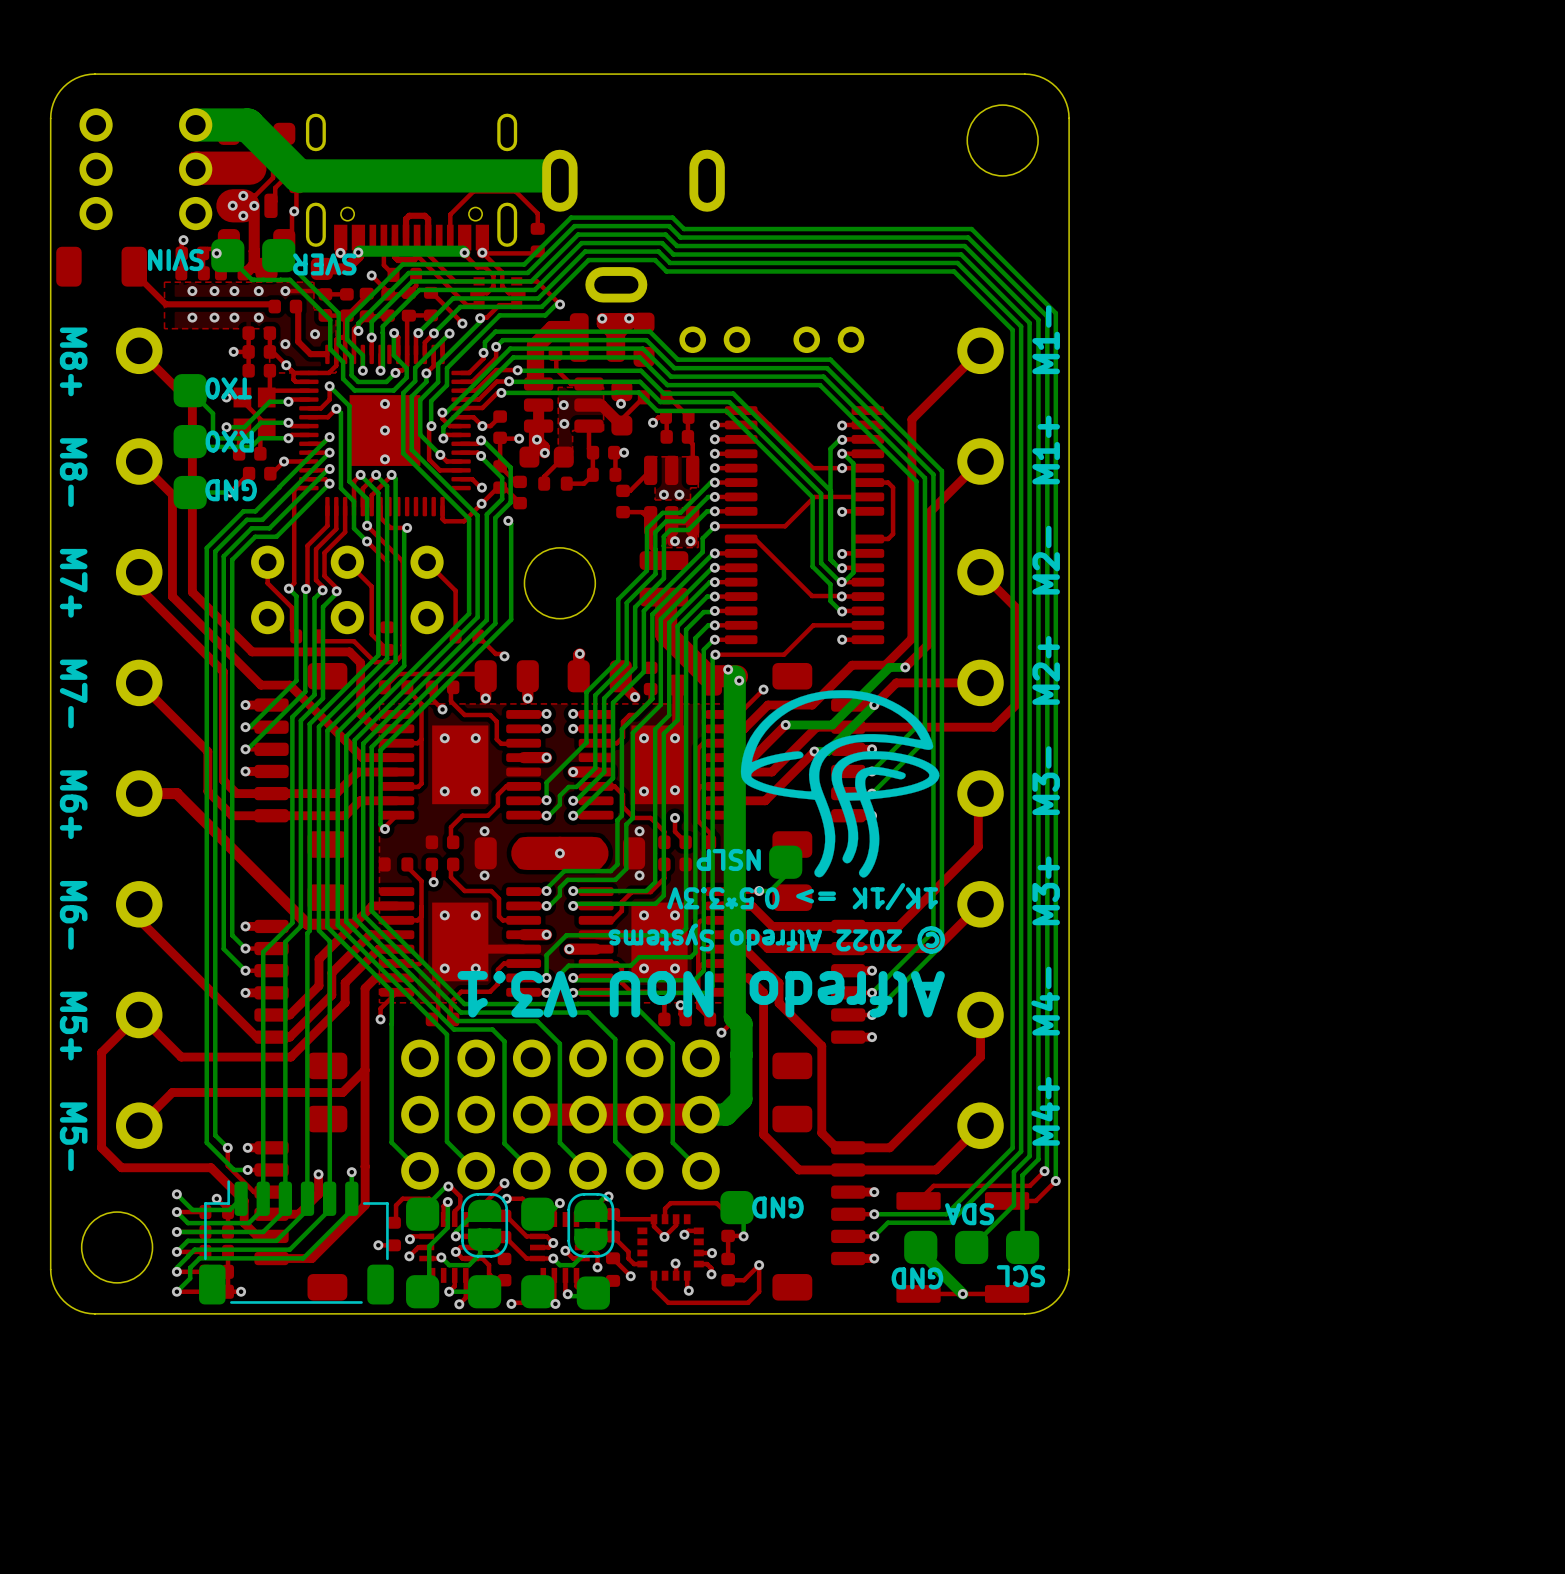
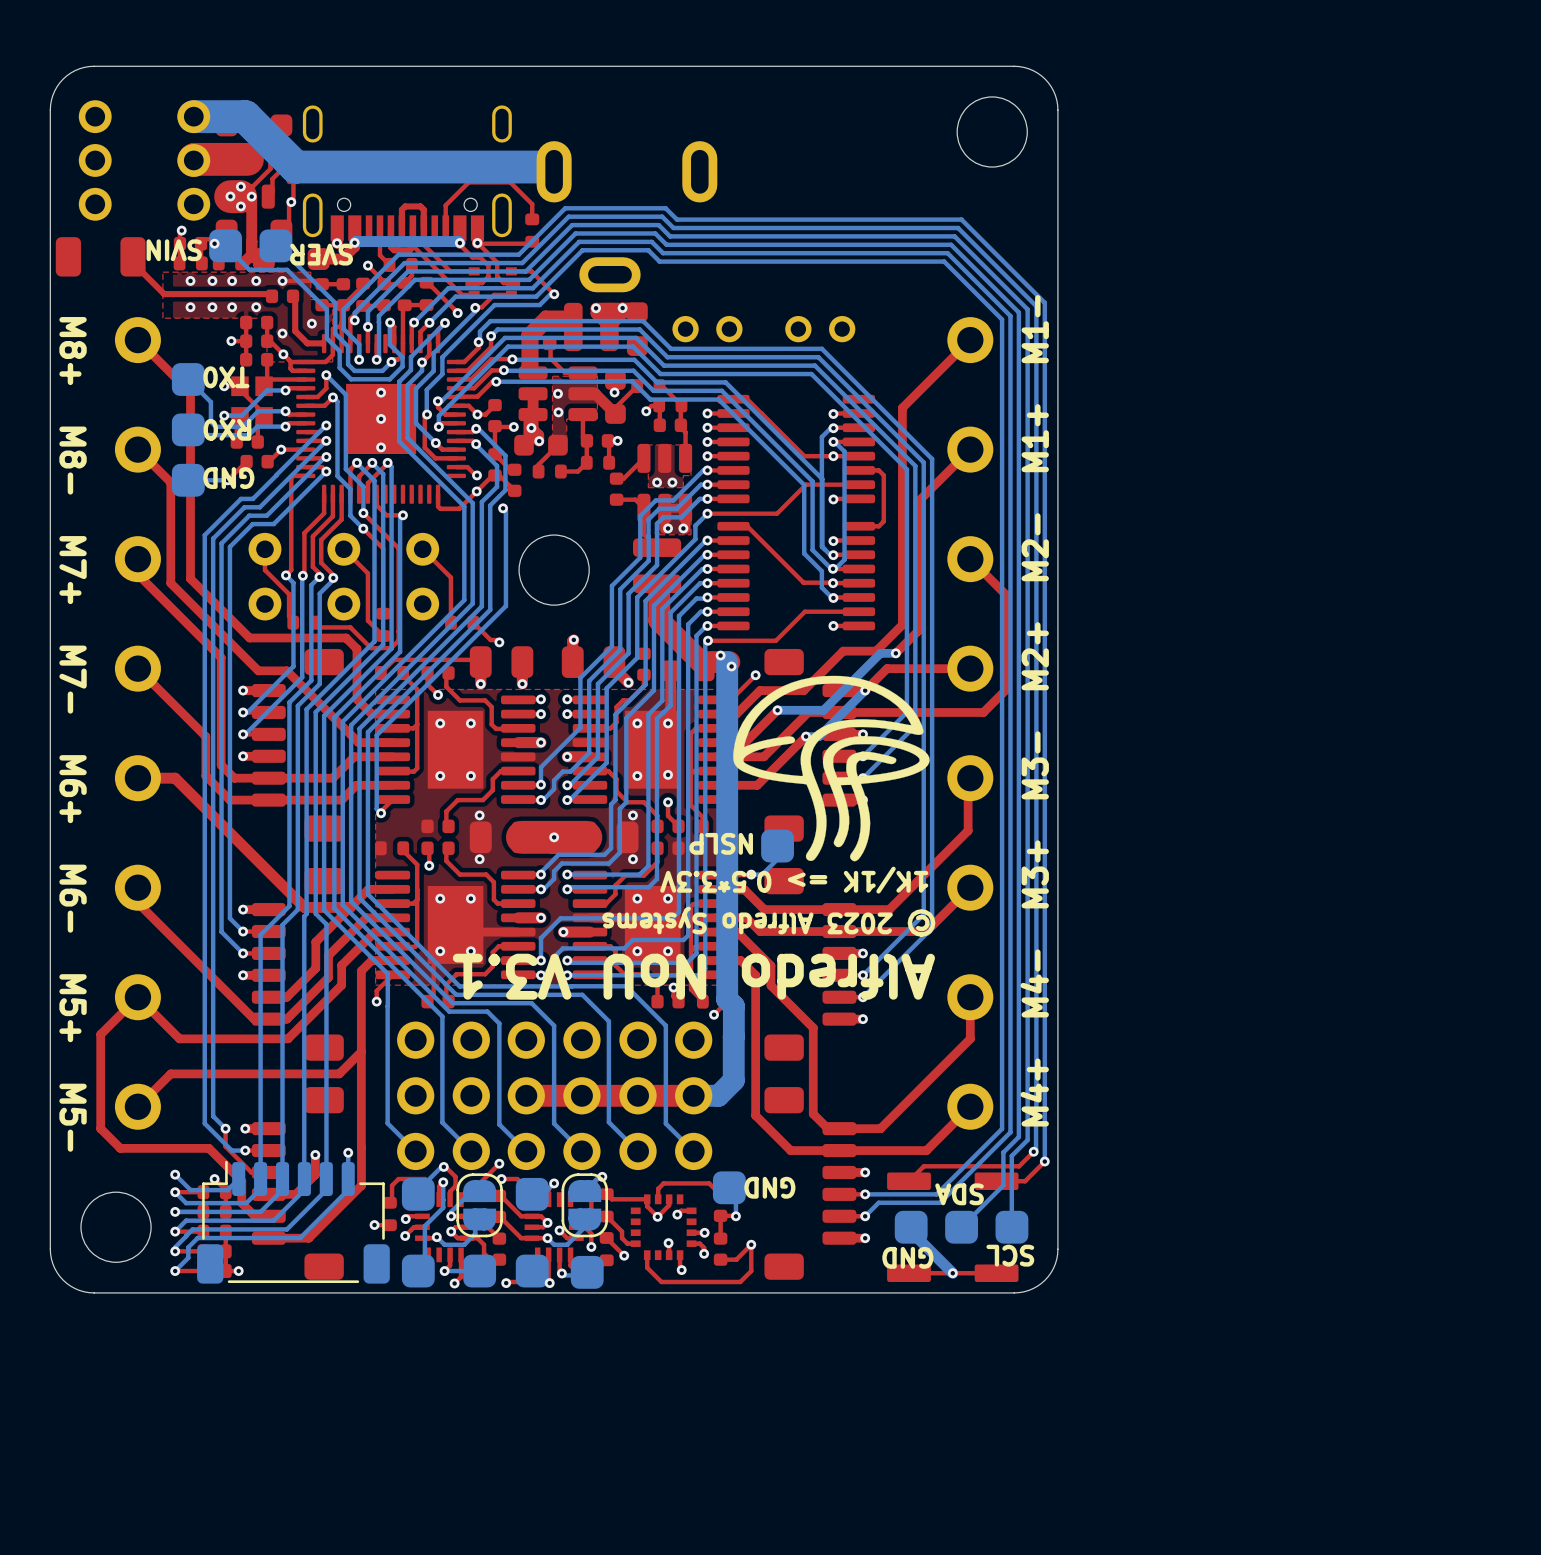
text: © 2022 Alfredo Systems (776, 938) -> © 2023 Alfredo Systems (768, 921)

